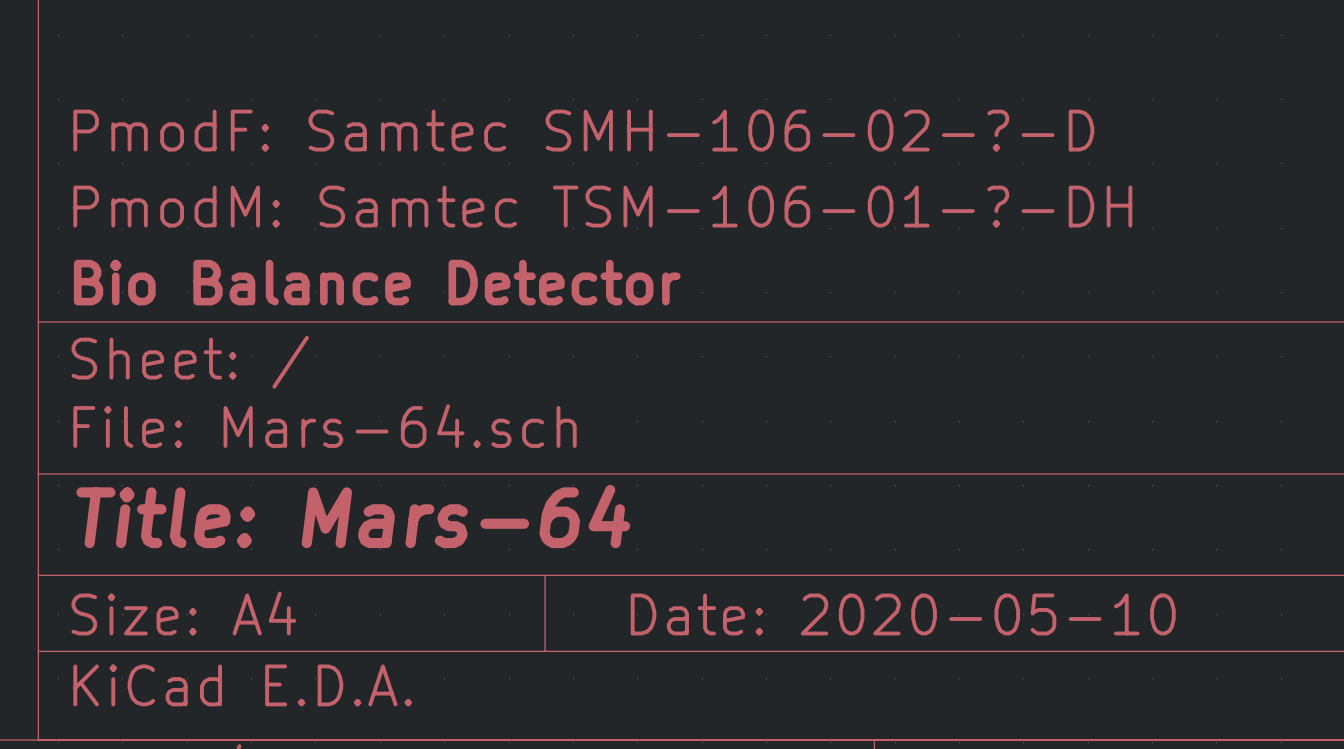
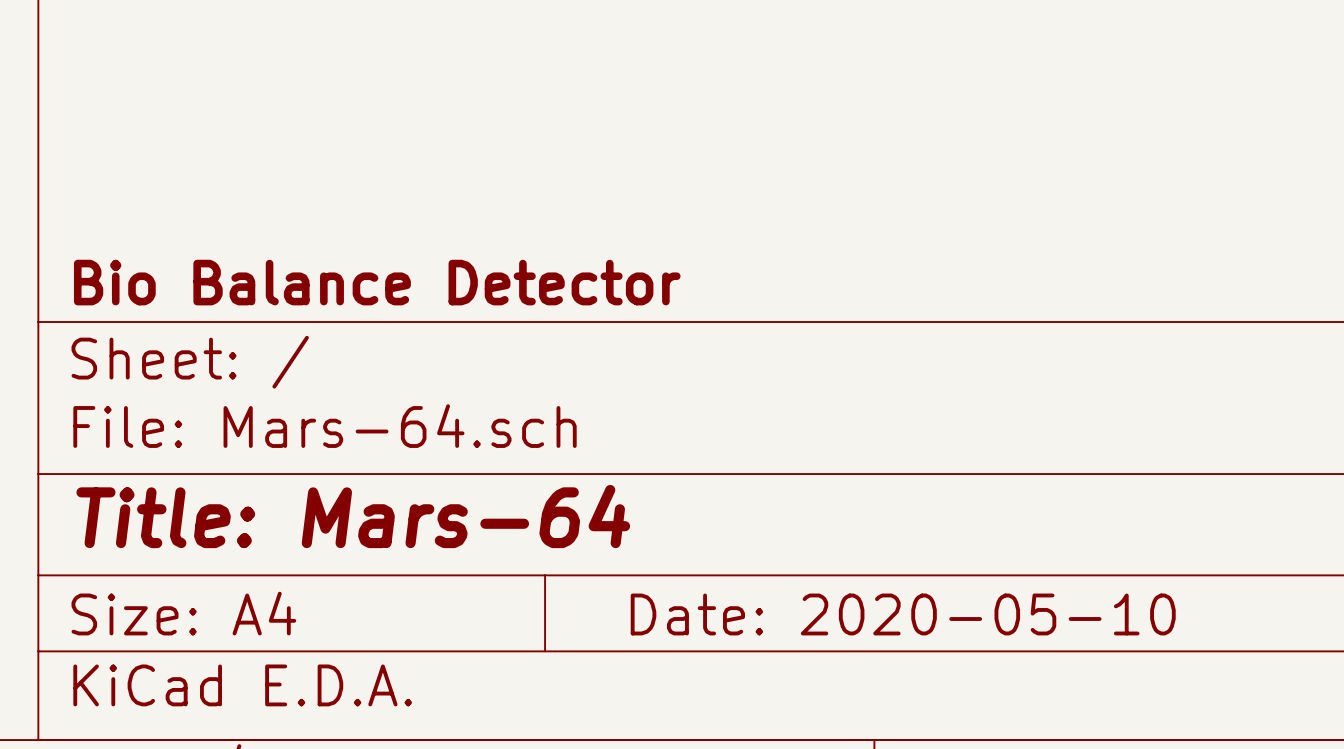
title block: PmodF: Samtec SMH-106-02-?-D (583, 130) -> none
title block: PmodM: Samtec TSM-106-01-?-DH (602, 206) -> none

